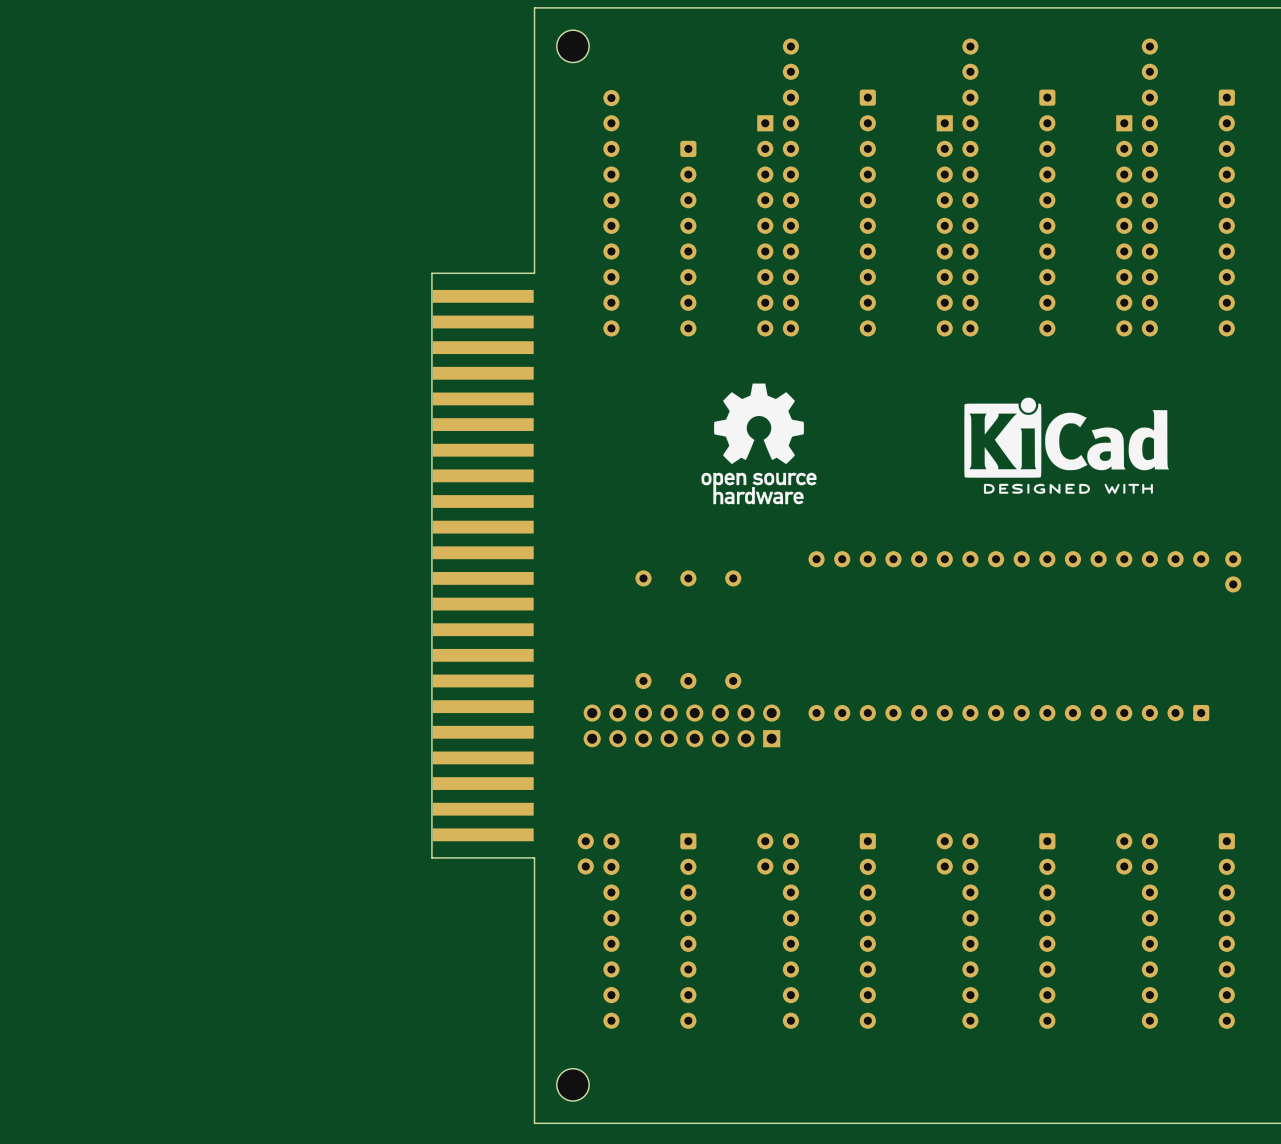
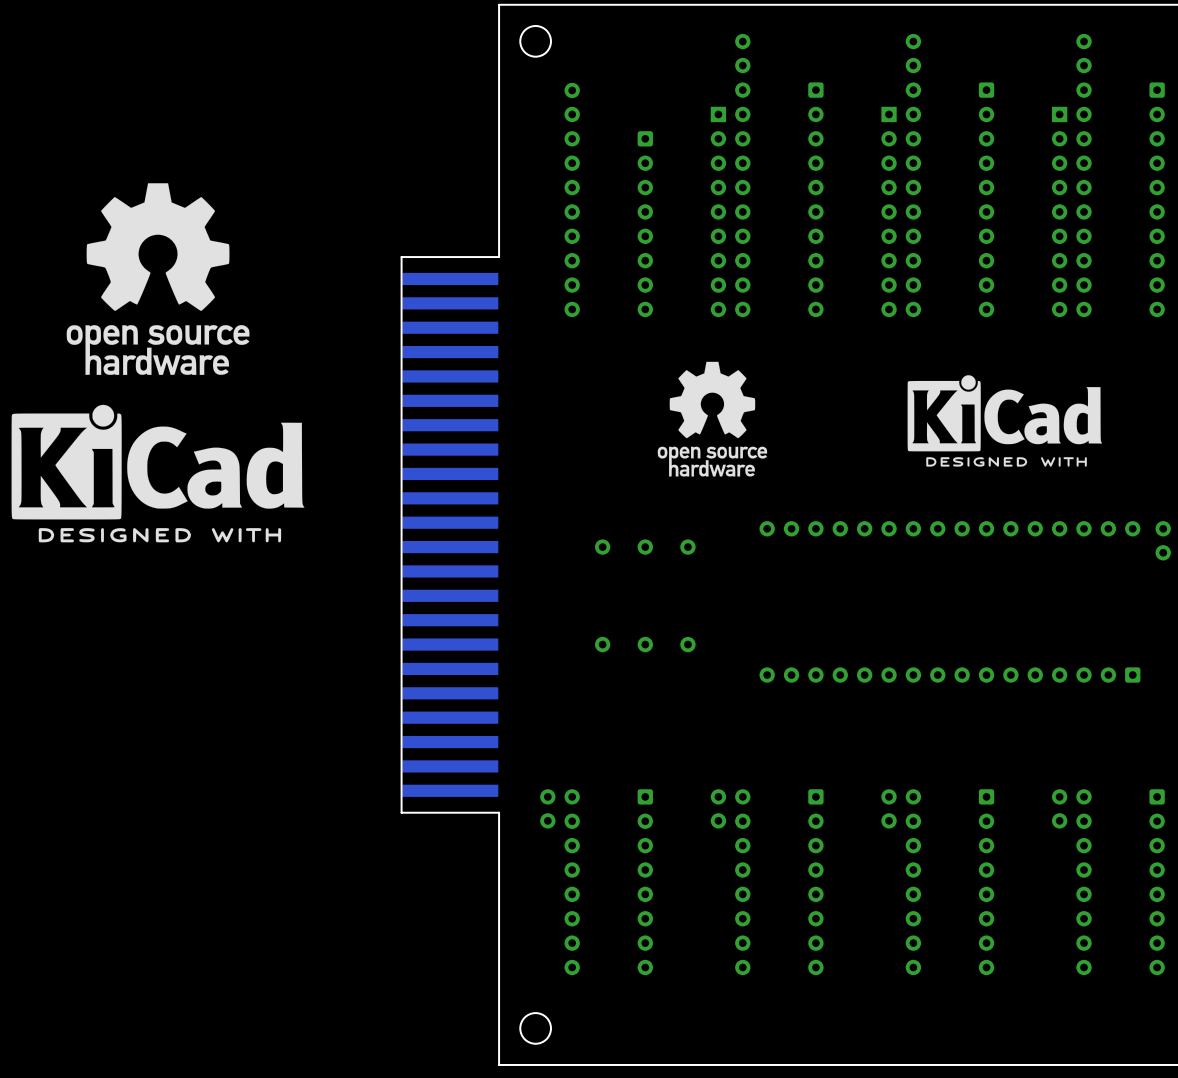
drawing: none -> [66, 183, 250, 375]
drawing: none -> [11, 404, 305, 543]
part: (681, 725) -> none

